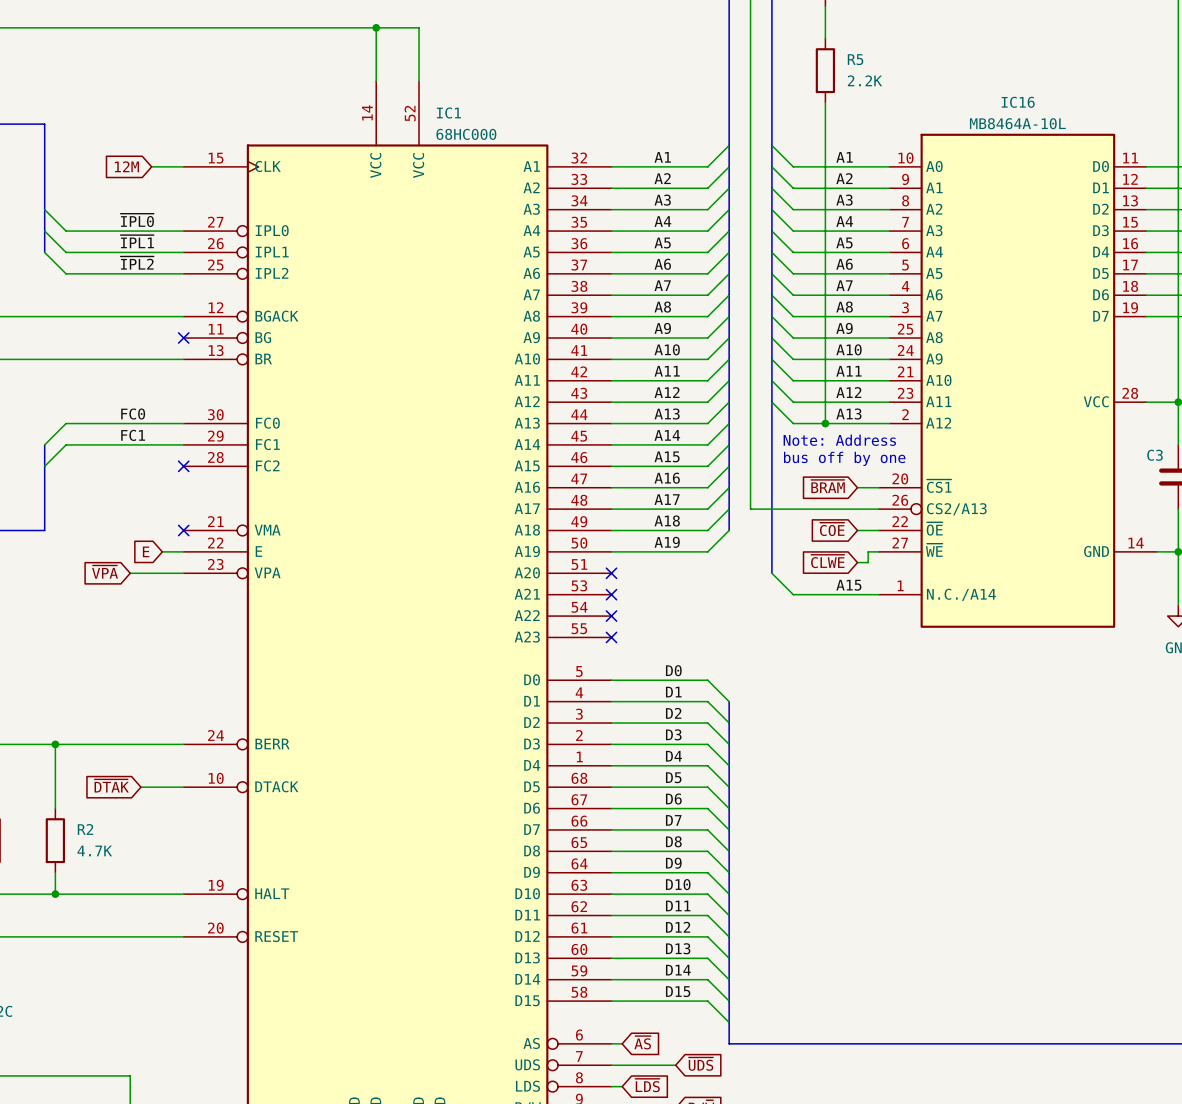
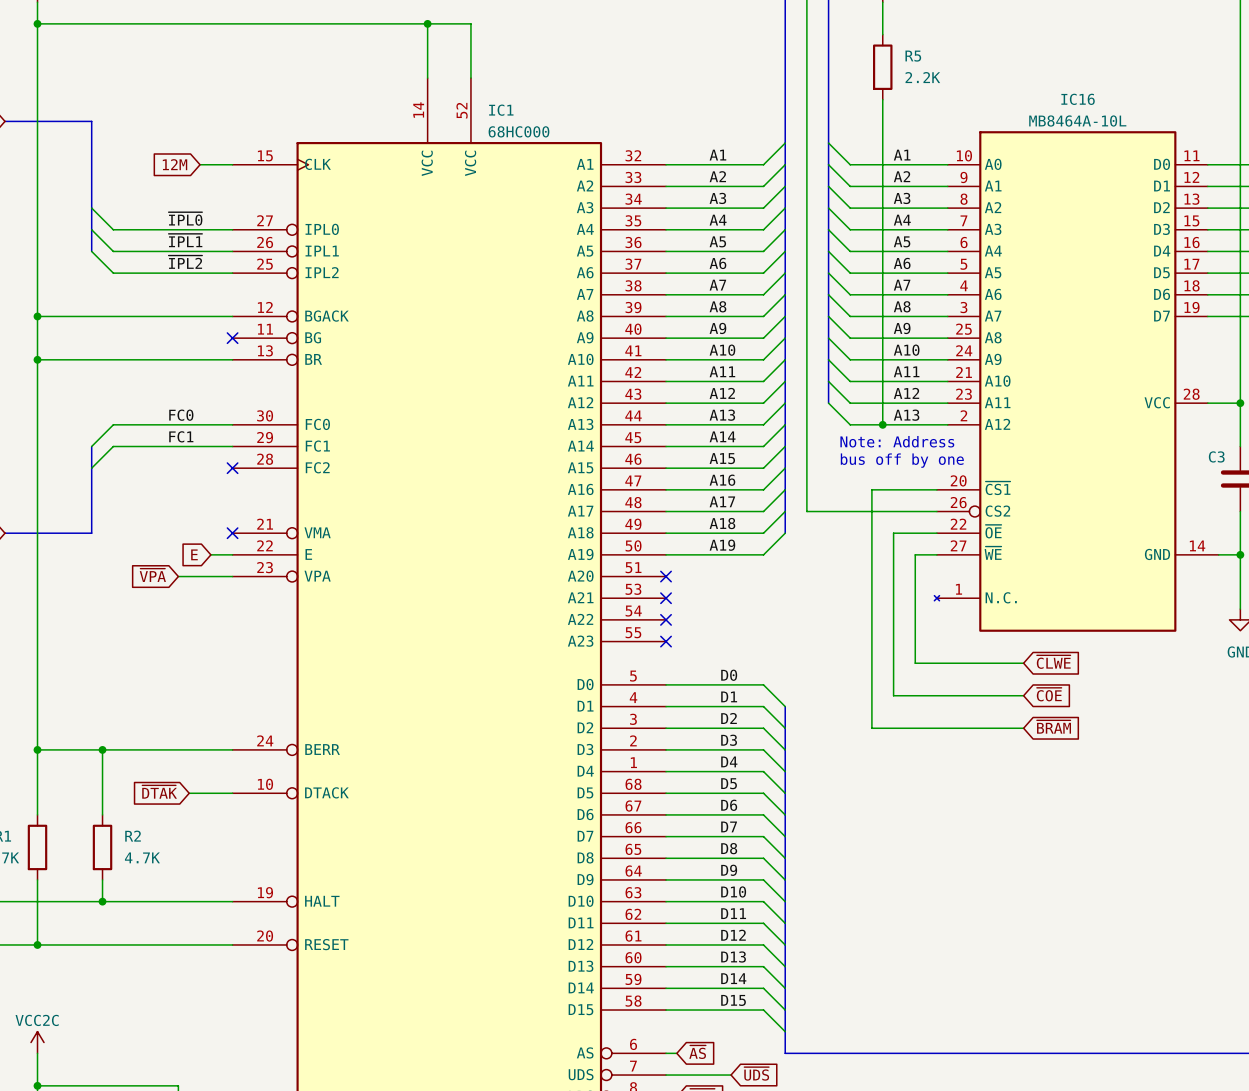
IC16 symbol: [878, 133, 1157, 628] -> [934, 131, 1219, 632]
bus: (771, 402) (771, 573) -> none
global label: ~{BRAM} (828, 486) -> none
wire: none -> (915, 489) (871, 489) (871, 728) (1023, 728)
global label rotation: 0° (832, 529) -> 180° (1049, 694)
global label position: ~{COE} (832, 529) -> ~{COE} (1049, 694)
wire: none -> (915, 533) (893, 533) (893, 695) (1023, 695)
wire: (868, 551) (868, 562) (857, 562) -> (926, 554) (915, 554) (915, 663) (1023, 663)
global label rotation: 0° (827, 561) -> 180° (1053, 662)
global label position: ~{CLWE} (827, 561) -> ~{CLWE} (1053, 662)
wire: (771, 573) (793, 594) (878, 594) -> none
label: A15 (848, 585) -> none
global label: none -> ~{BRAM} (1053, 727)

